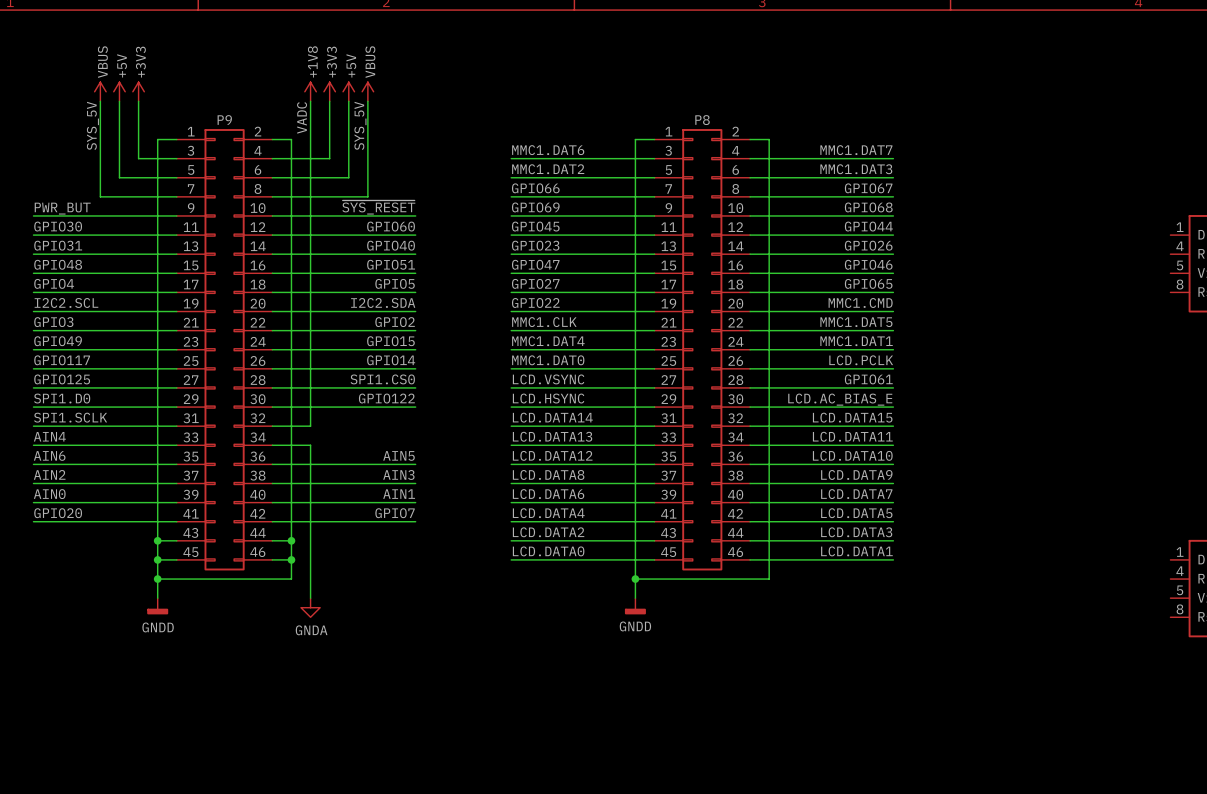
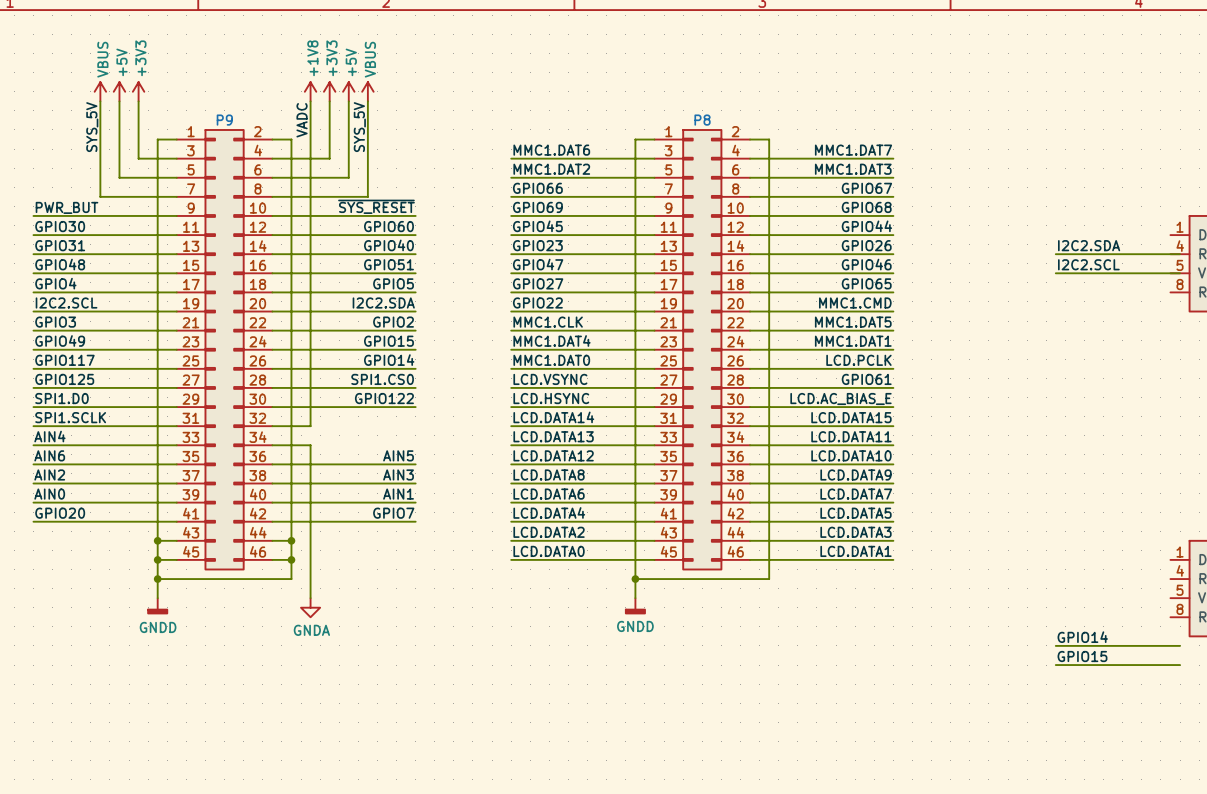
label: none -> I2C2.SDA (1089, 245)
wire: none -> (1055, 254) (1180, 254)
label: none -> I2C2.SCL (1088, 264)
wire: none -> (1055, 273) (1180, 273)
label: none -> GPIO14 (1082, 637)
wire: none -> (1055, 645) (1180, 645)
label: none -> GPIO15 (1082, 656)
wire: none -> (1055, 665) (1180, 665)

